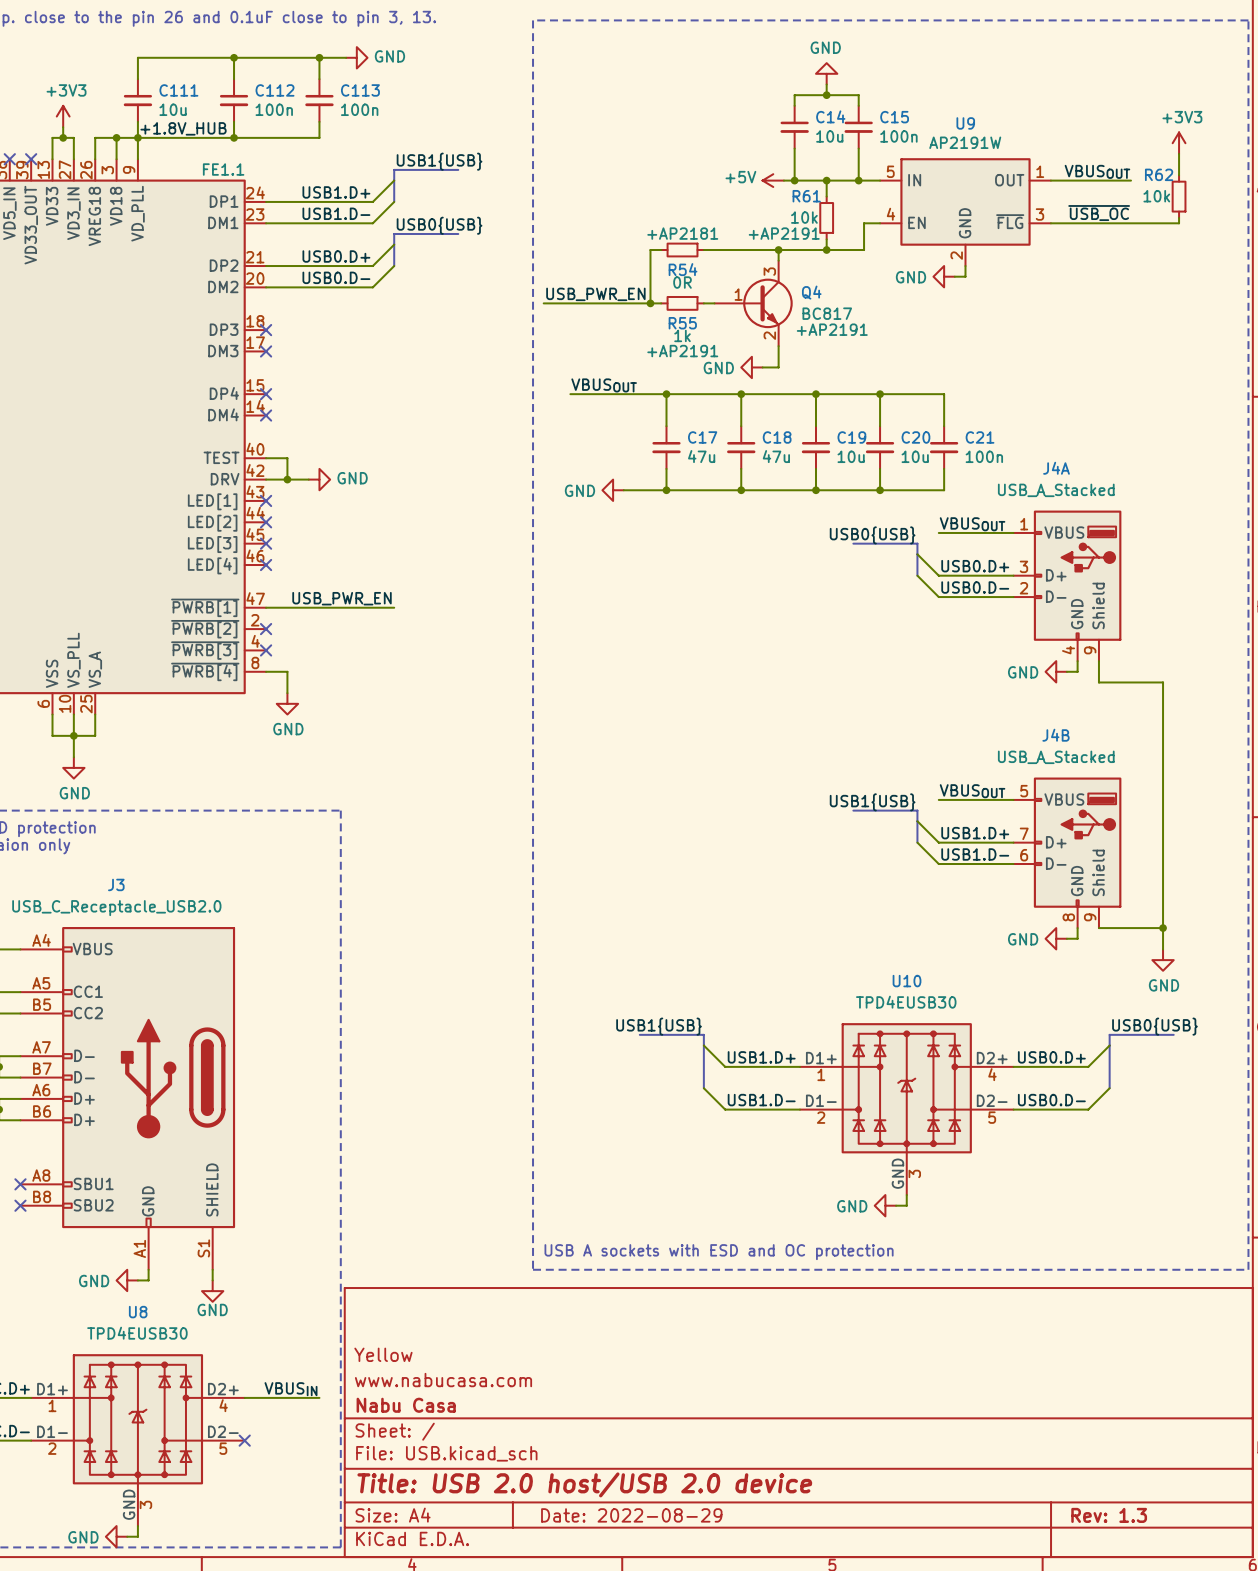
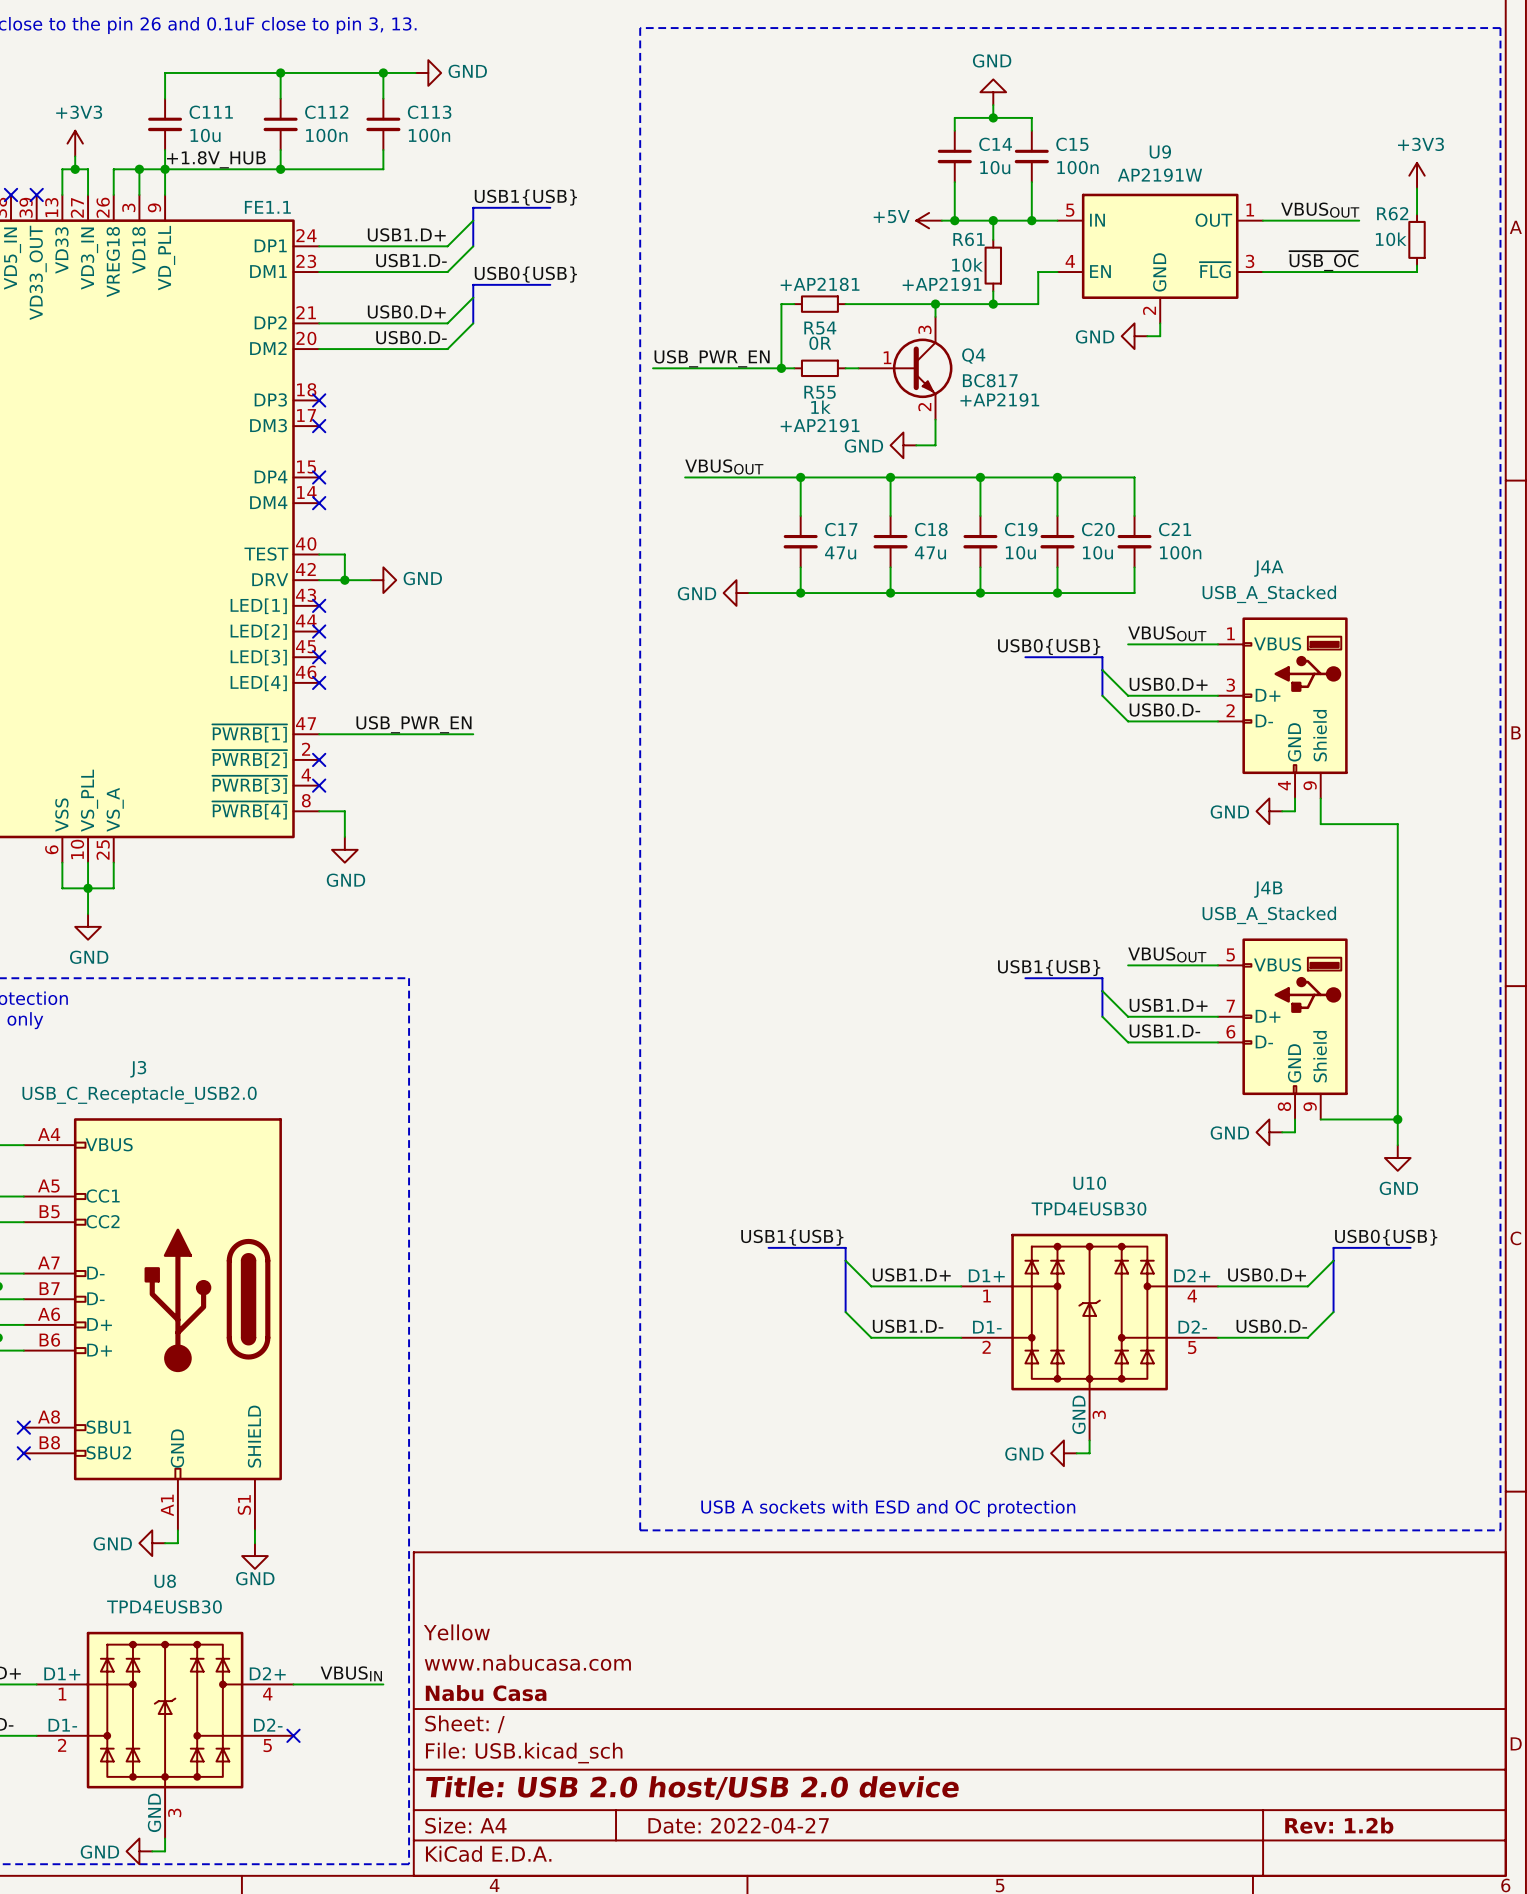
title block: Date: 2022-08-29 (631, 1515) -> Date: 2022-04-27 (738, 1825)
title block: Rev: 1.3 (1109, 1515) -> Rev: 1.2b (1339, 1825)

